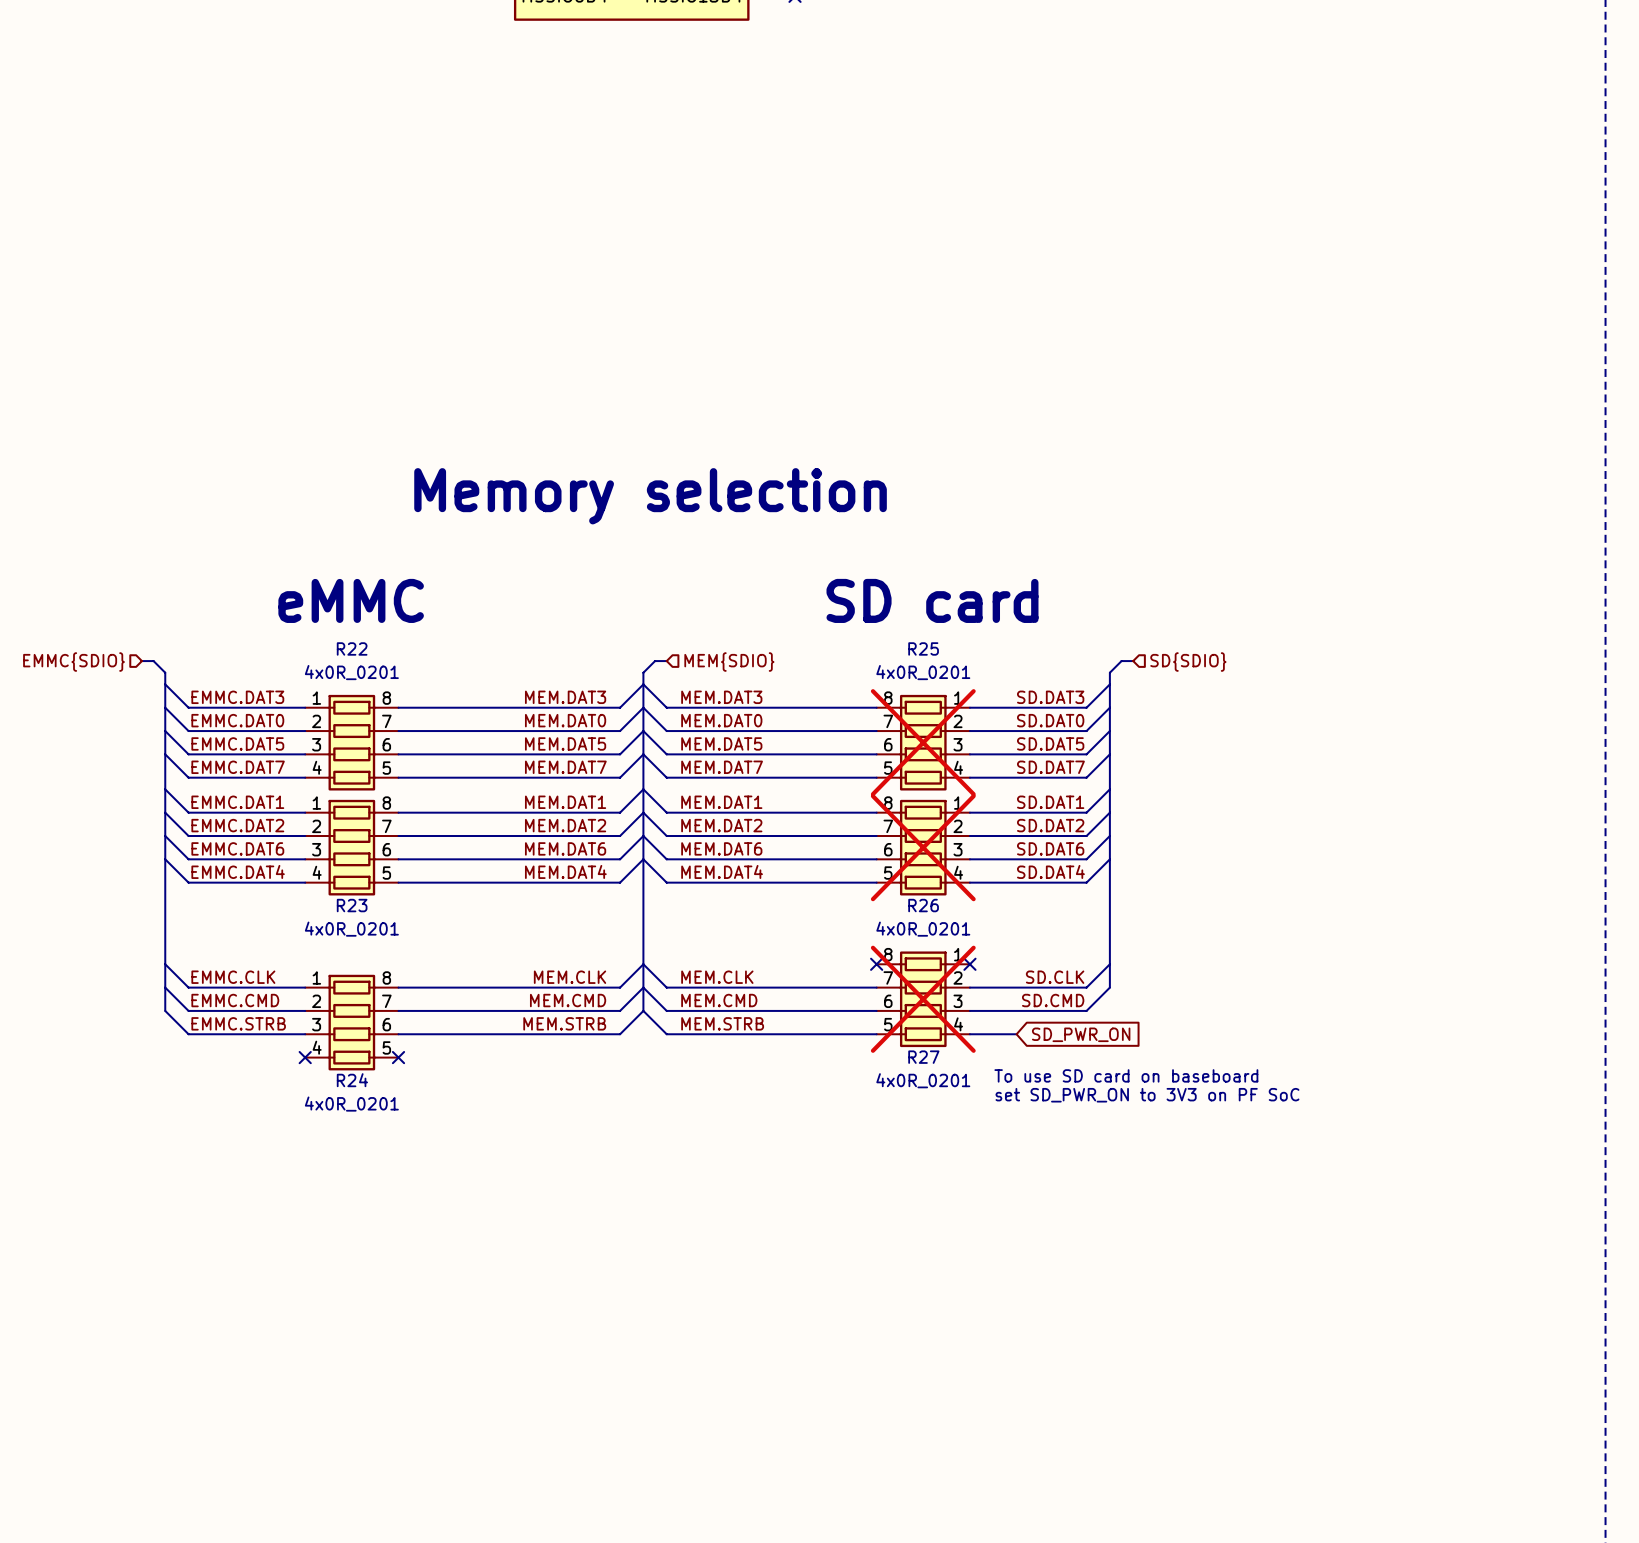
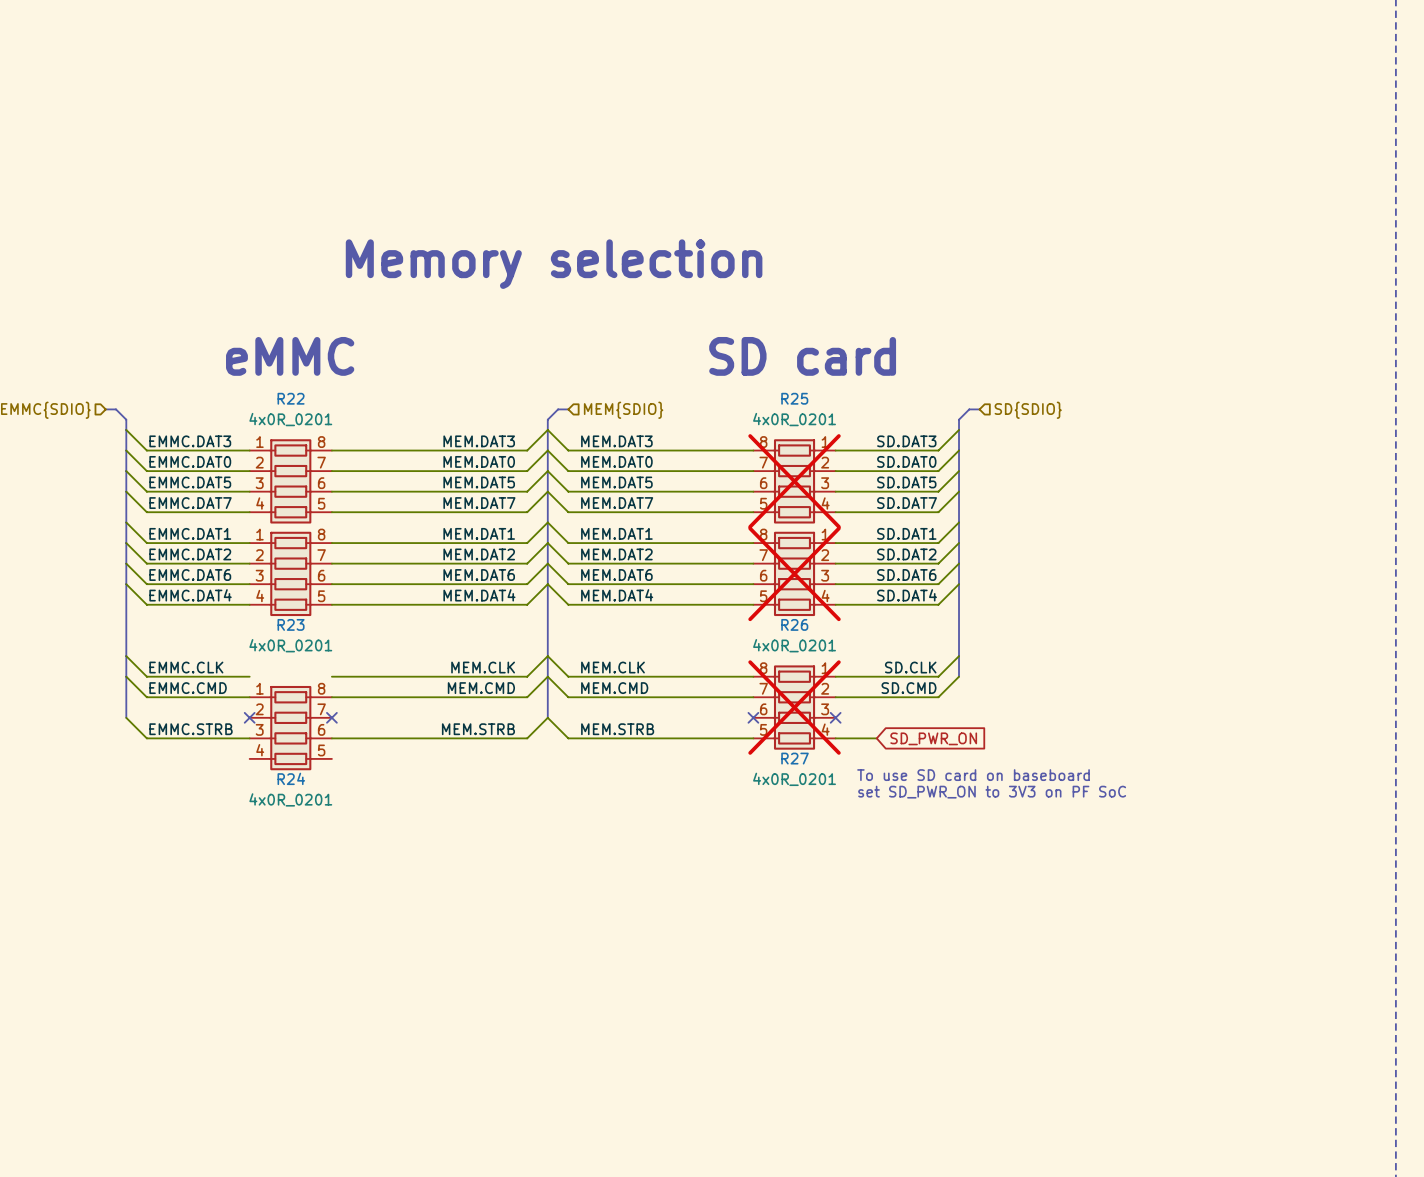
label: none -> EMMC.CLK (186, 667)
label: none -> MEM.CLK (483, 667)
label: none -> MEM.CLK (612, 667)
label: none -> SD.CLK (910, 667)
no-connect mark position: (876, 964) -> (753, 717)
no-connect mark position: (969, 964) -> (835, 717)
bus: (1109, 964) (1109, 987) -> none
label: EMMC.CLK (233, 977) -> EMMC.CMD (188, 688)
label: MEM.CLK (570, 977) -> MEM.CMD (481, 688)
label: MEM.CLK (717, 977) -> MEM.CMD (614, 688)
label: SD.CLK (1055, 977) -> SD.CMD (909, 688)
wire: (165, 987) (188, 1010) (305, 1010) -> (126, 656) (146, 676) (249, 676)
wire: (1109, 987) (1086, 1010) (969, 1010) -> (959, 656) (938, 676) (835, 676)
label: EMMC.CMD (235, 1000) -> none
label: MEM.CMD (568, 1000) -> none
label: MEM.CMD (719, 1000) -> none
label: SD.CMD (1053, 1000) -> none
wire: (398, 1010) (620, 1010) (643, 987) (666, 1010) (876, 1010) -> (331, 676) (527, 676) (547, 656) (568, 676) (753, 676)
no-connect mark position: (305, 1057) -> (249, 717)
no-connect mark position: (398, 1057) -> (331, 717)

